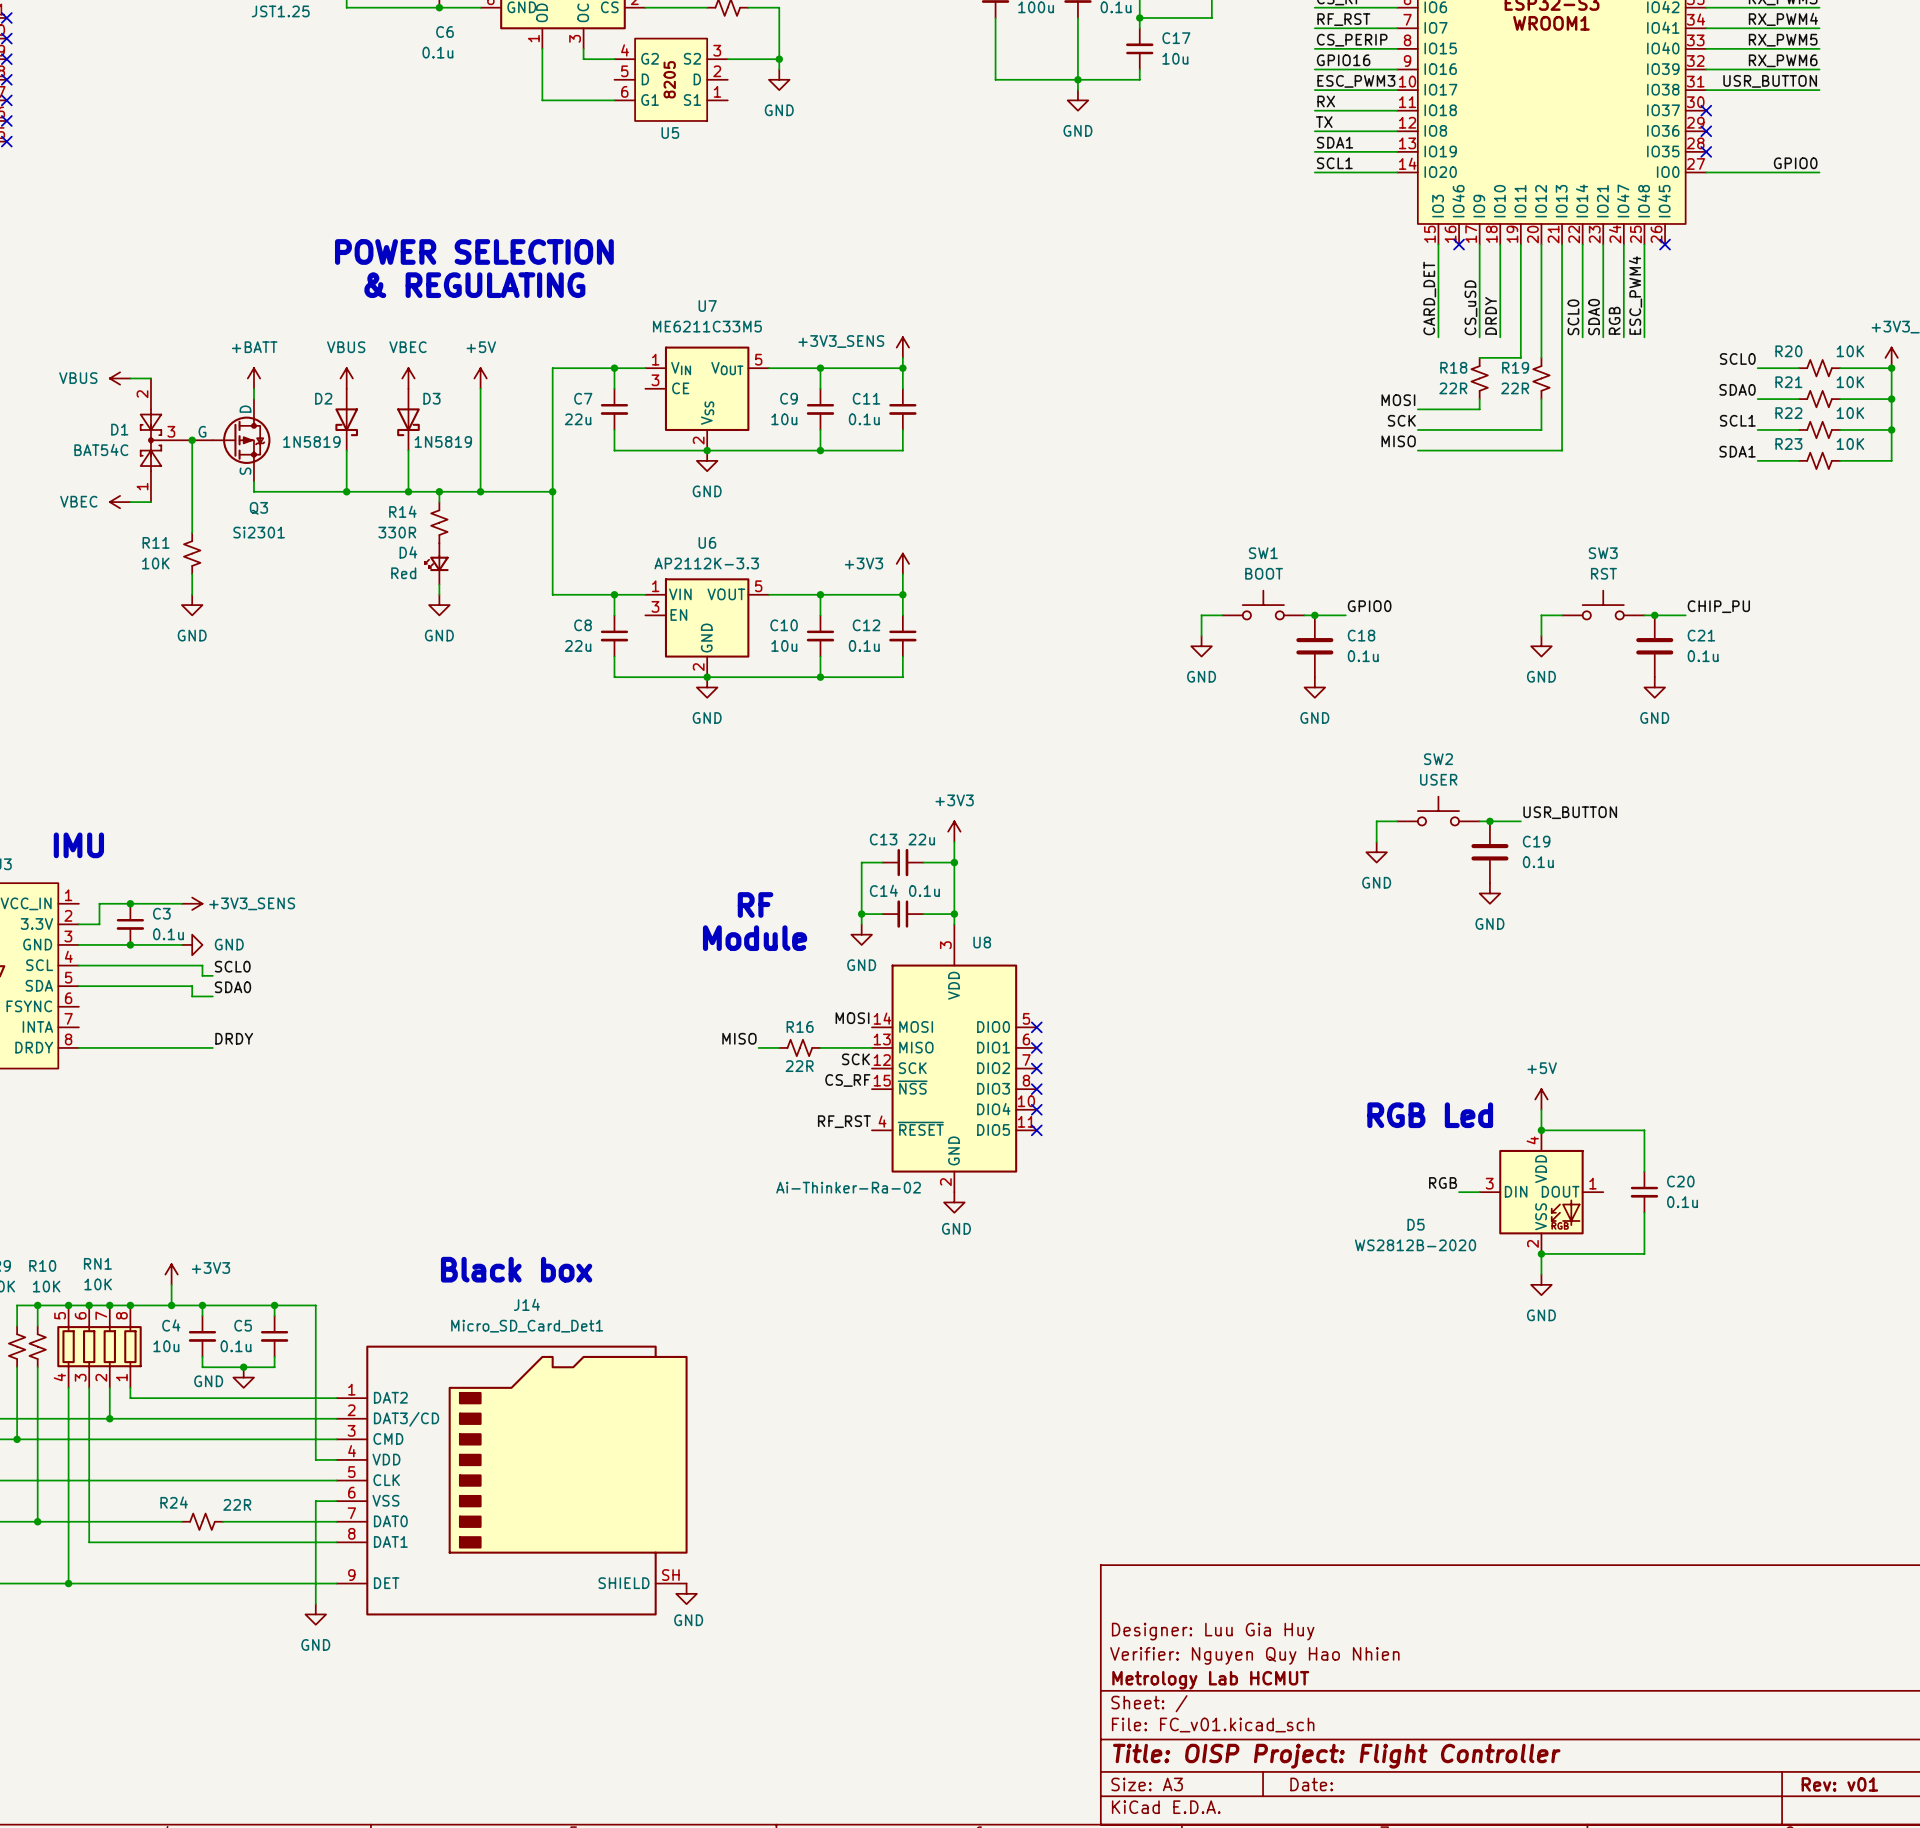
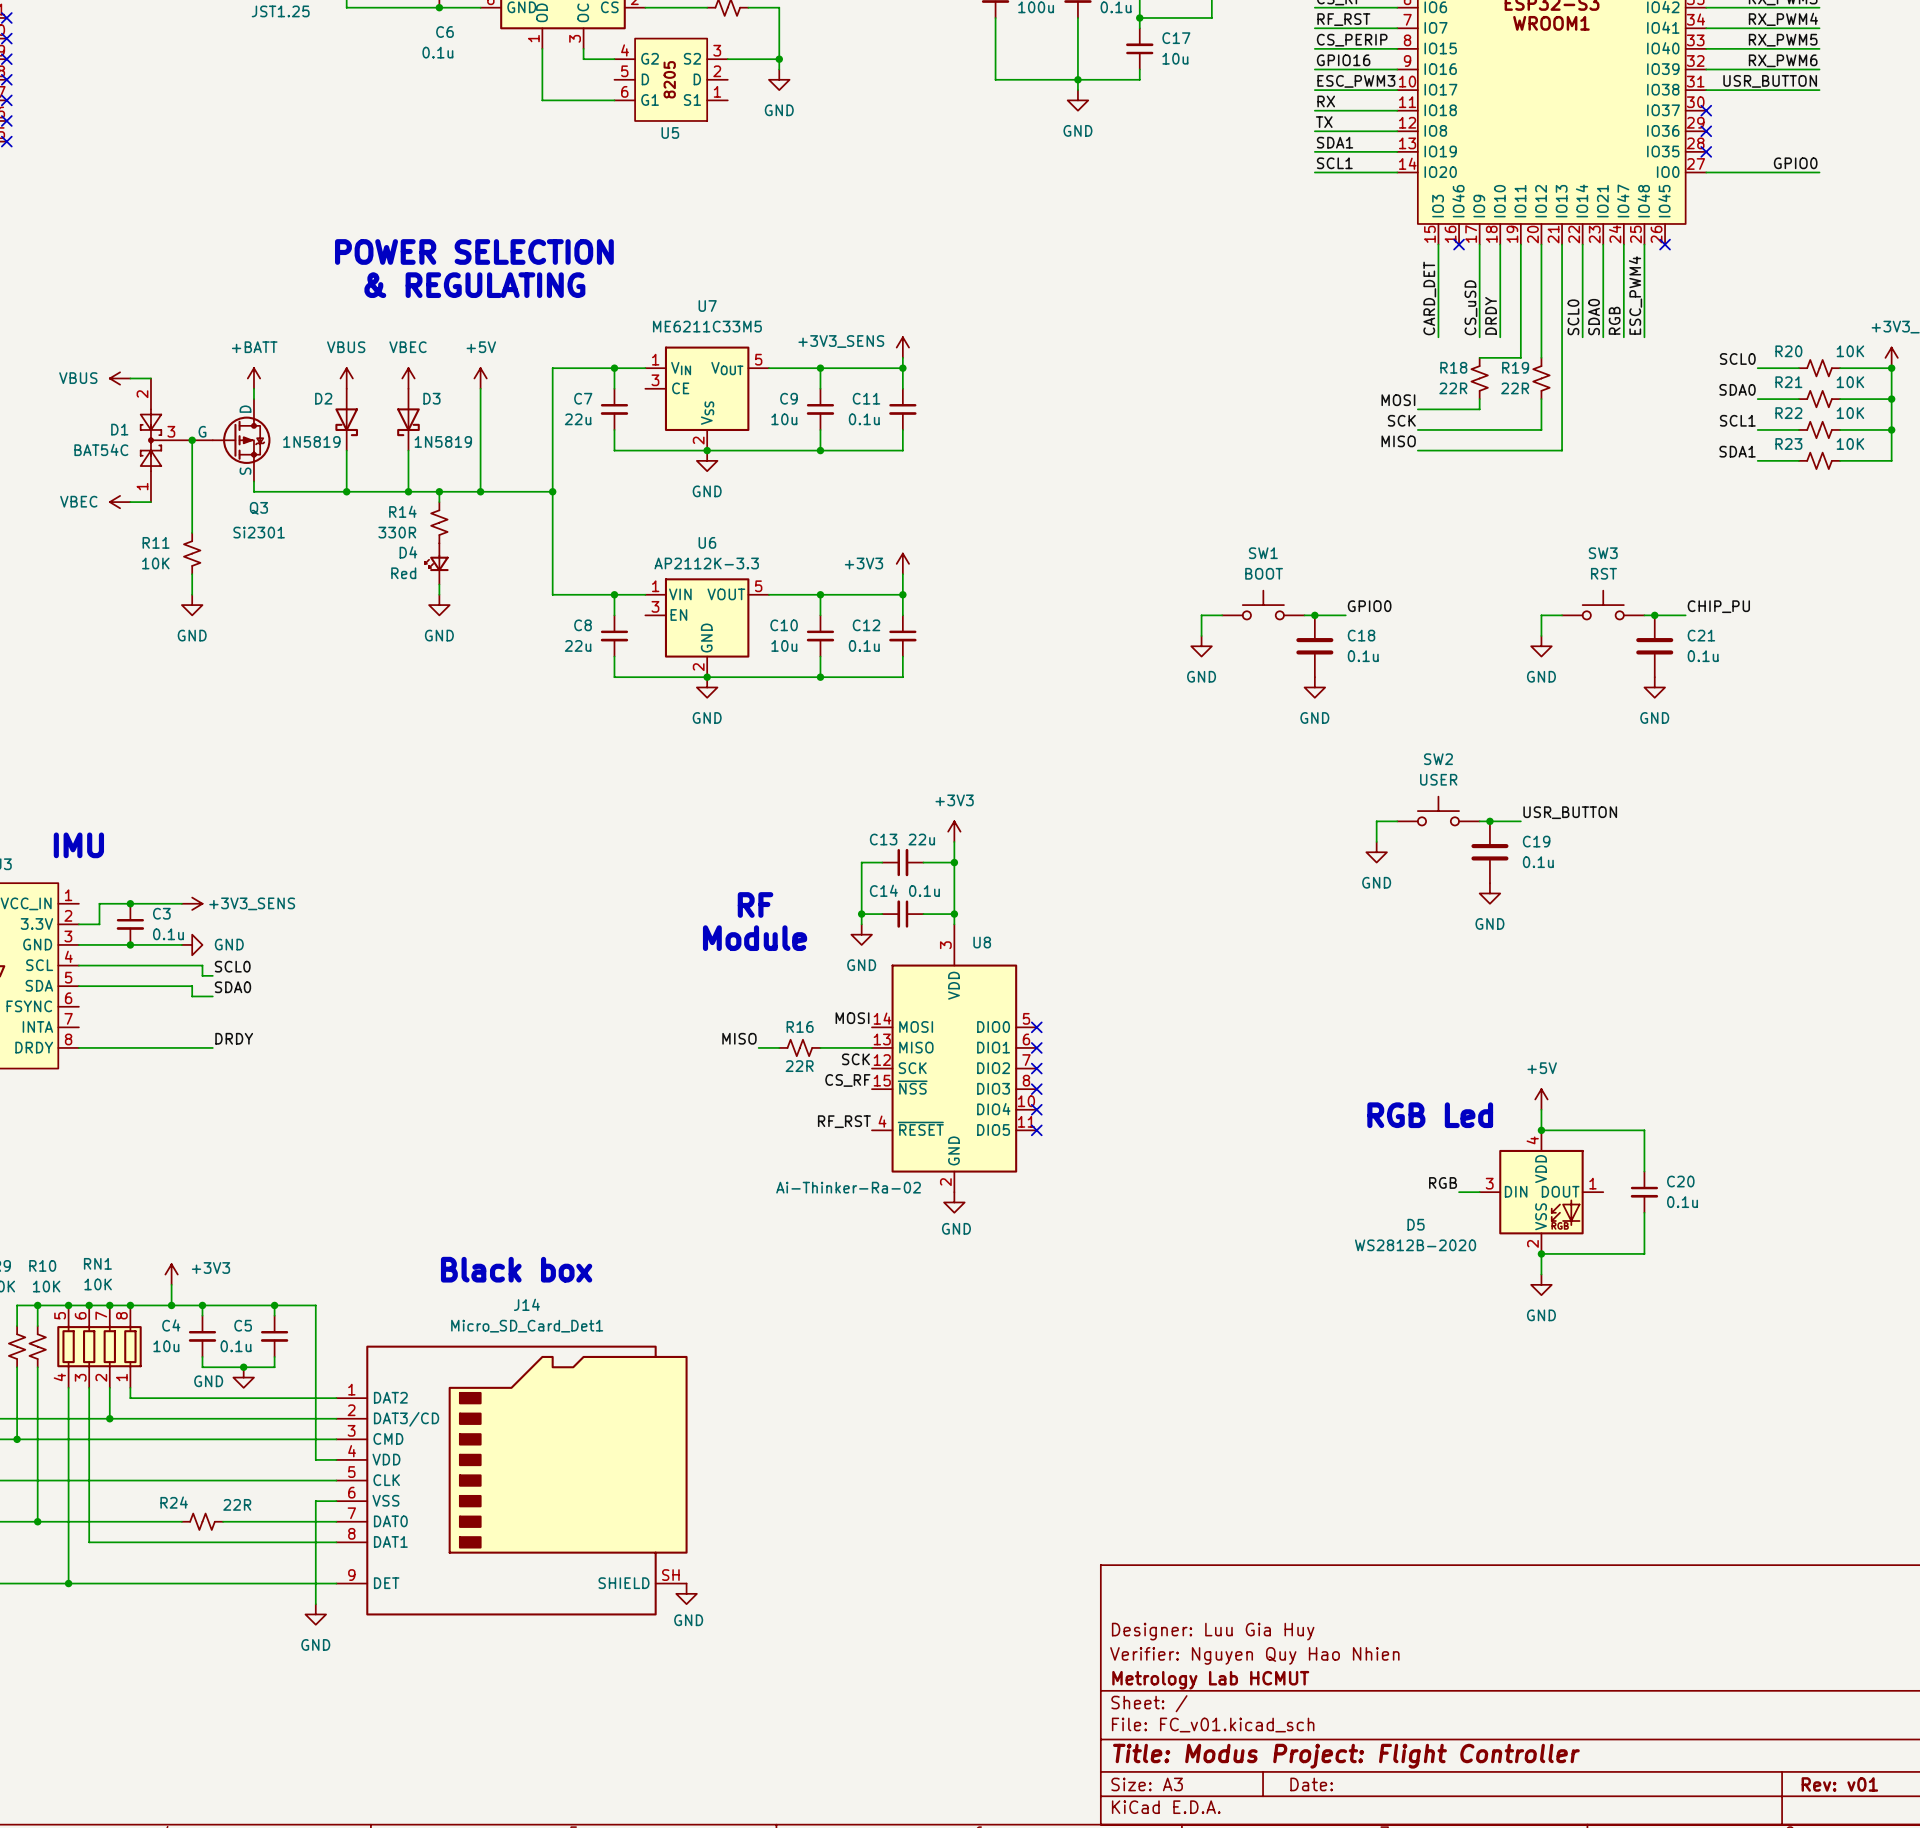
title block: Title: OISP Project: Flight Controller (1336, 1756) -> Title: Modus Project: Flight Controller (1346, 1756)

